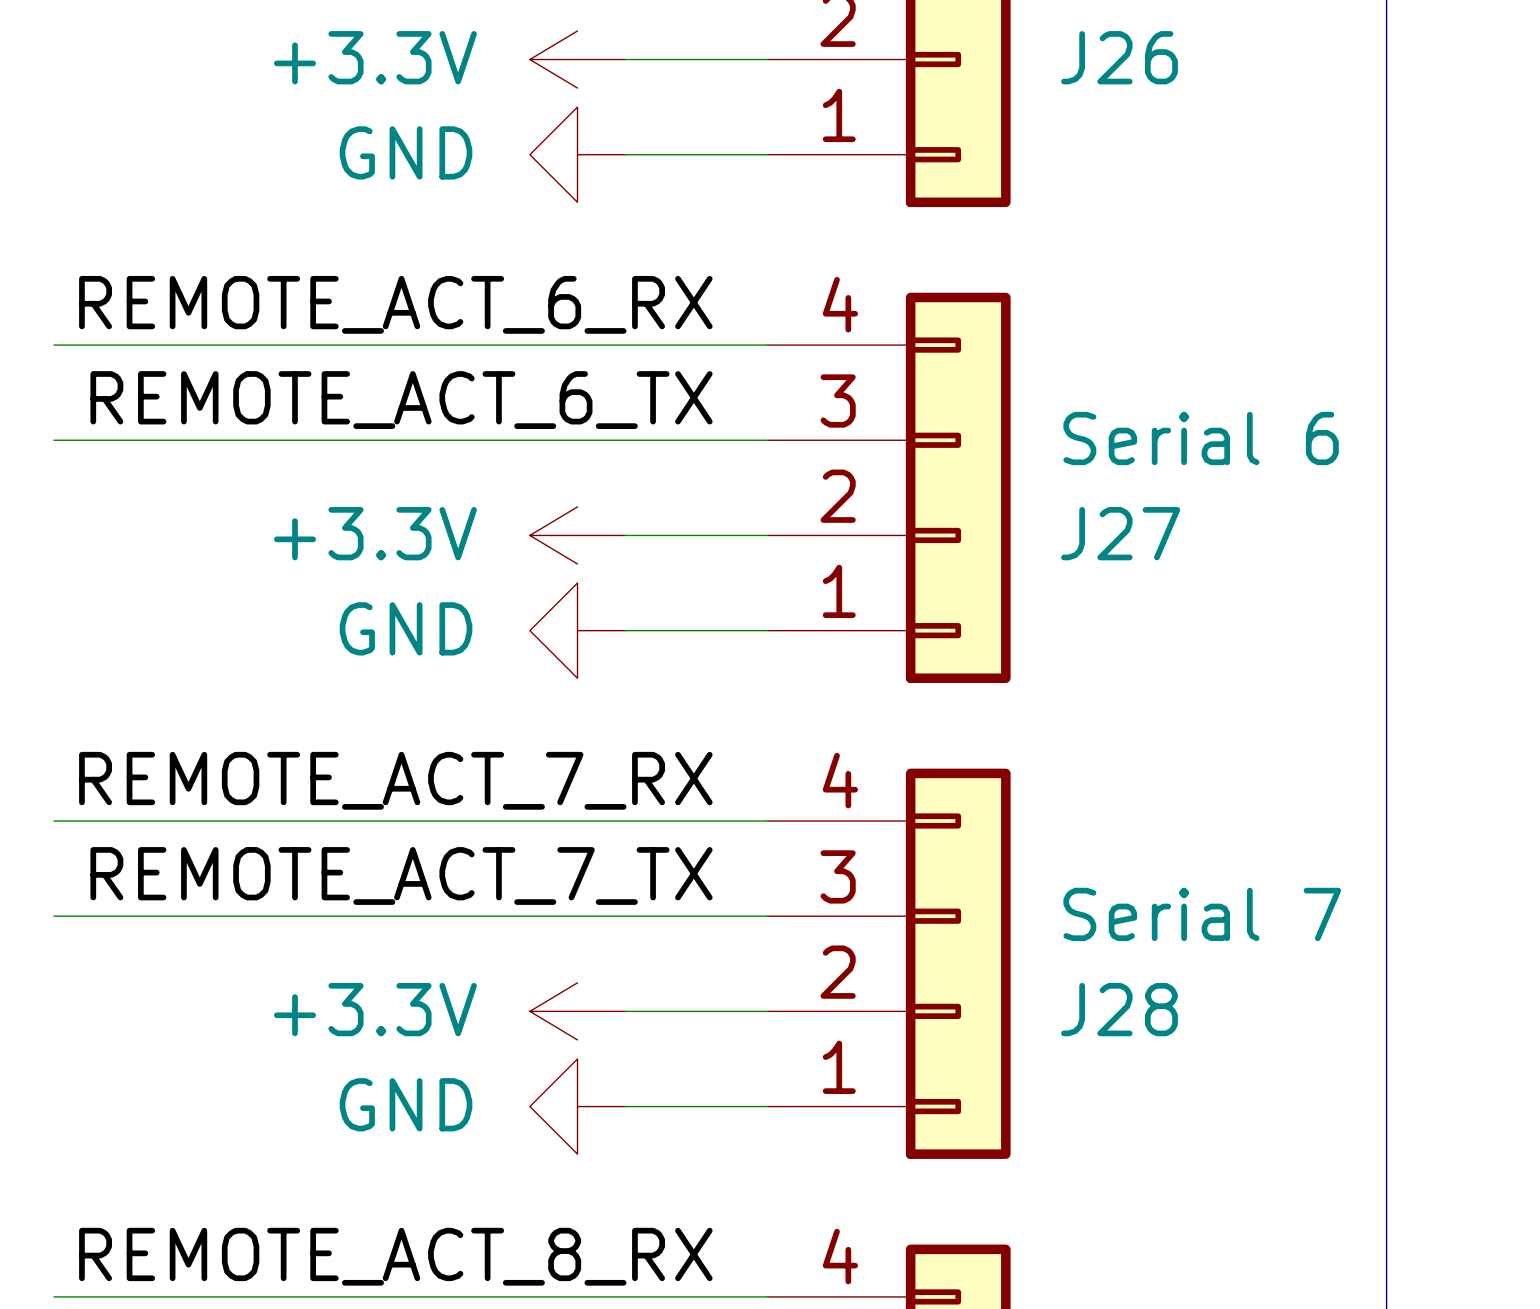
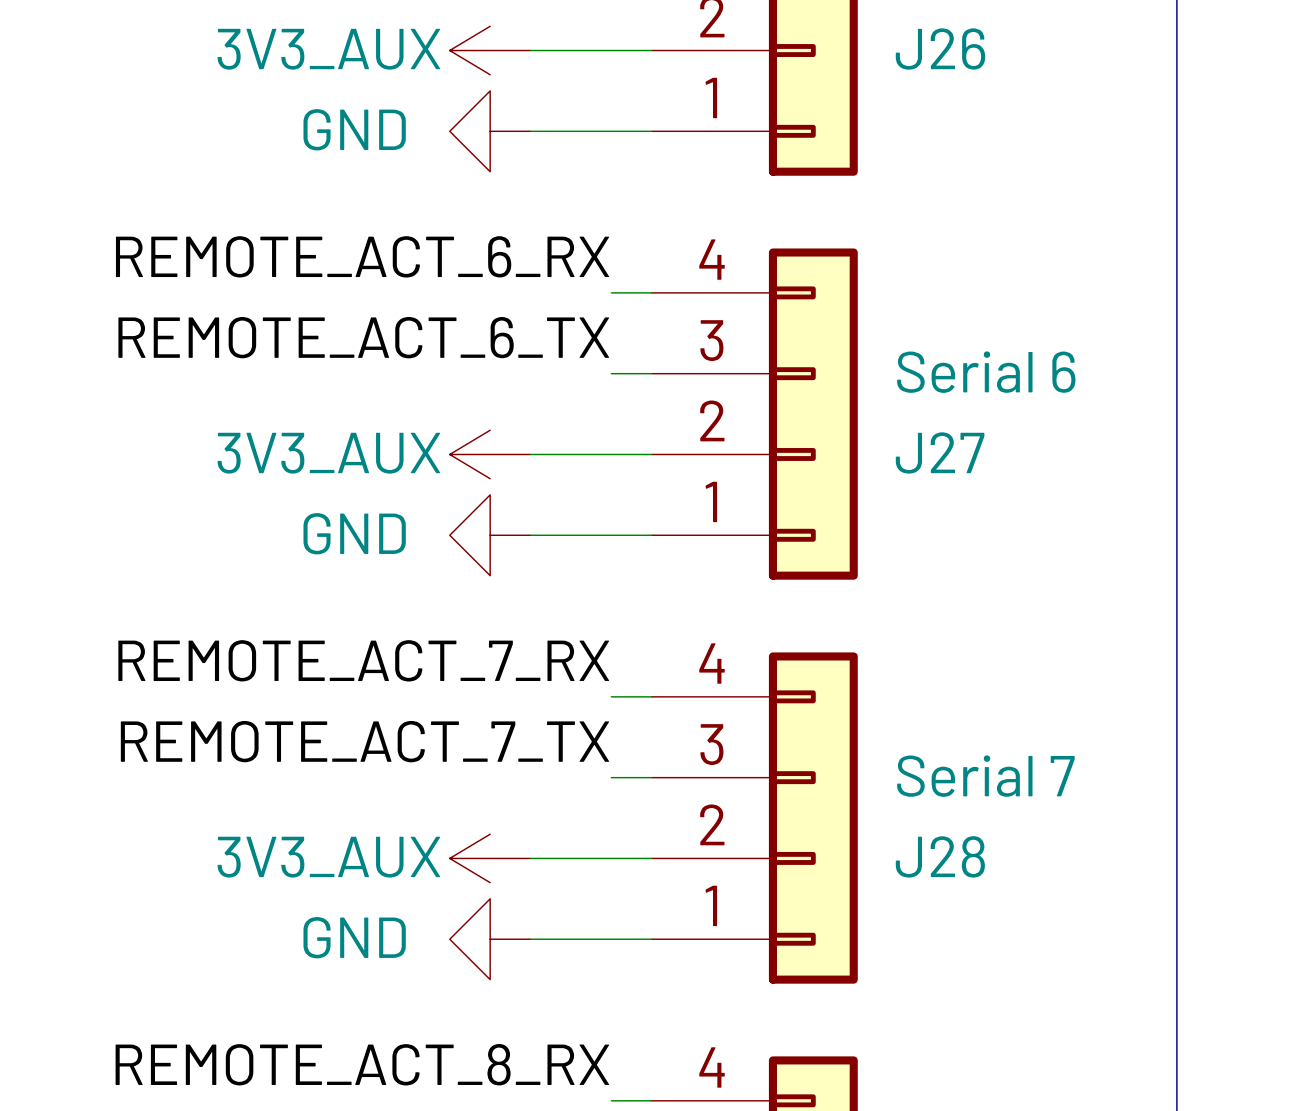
power symbol: +3.3V (577, 59) -> 3V3_AUX (490, 50)
wire: (53, 345) (720, 345) -> none
wire: (53, 440) (720, 440) -> none
power symbol: +3.3V (577, 535) -> 3V3_AUX (490, 454)
wire: (53, 821) (720, 821) -> none
wire: (53, 916) (720, 916) -> none
power symbol: +3.3V (577, 1011) -> 3V3_AUX (490, 858)
wire: (53, 1296) (720, 1296) -> none

